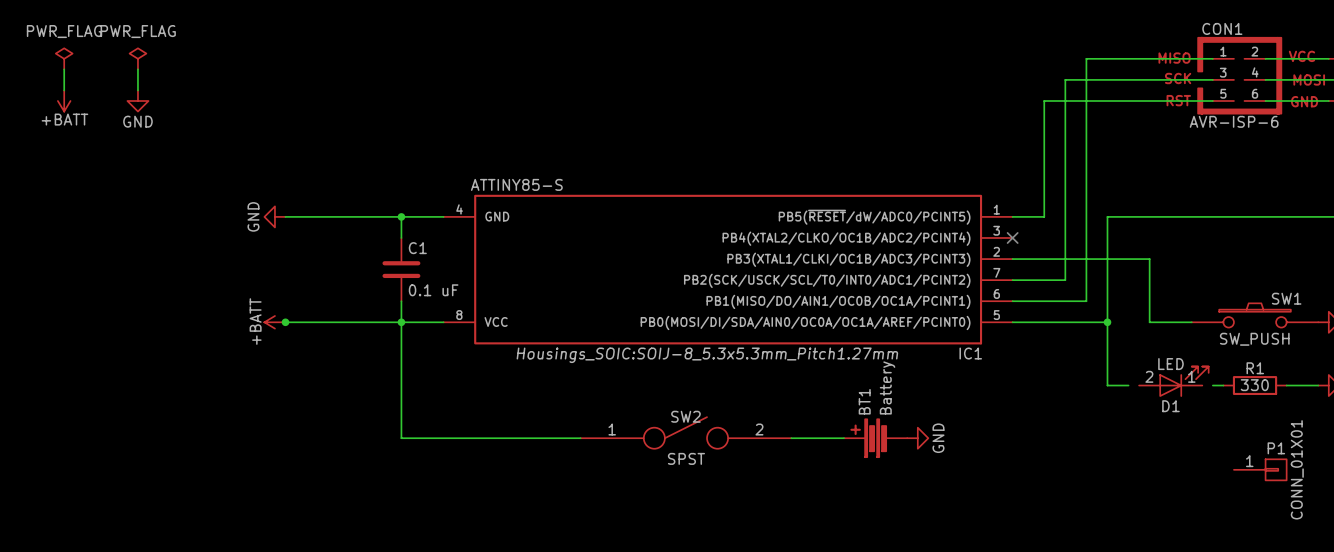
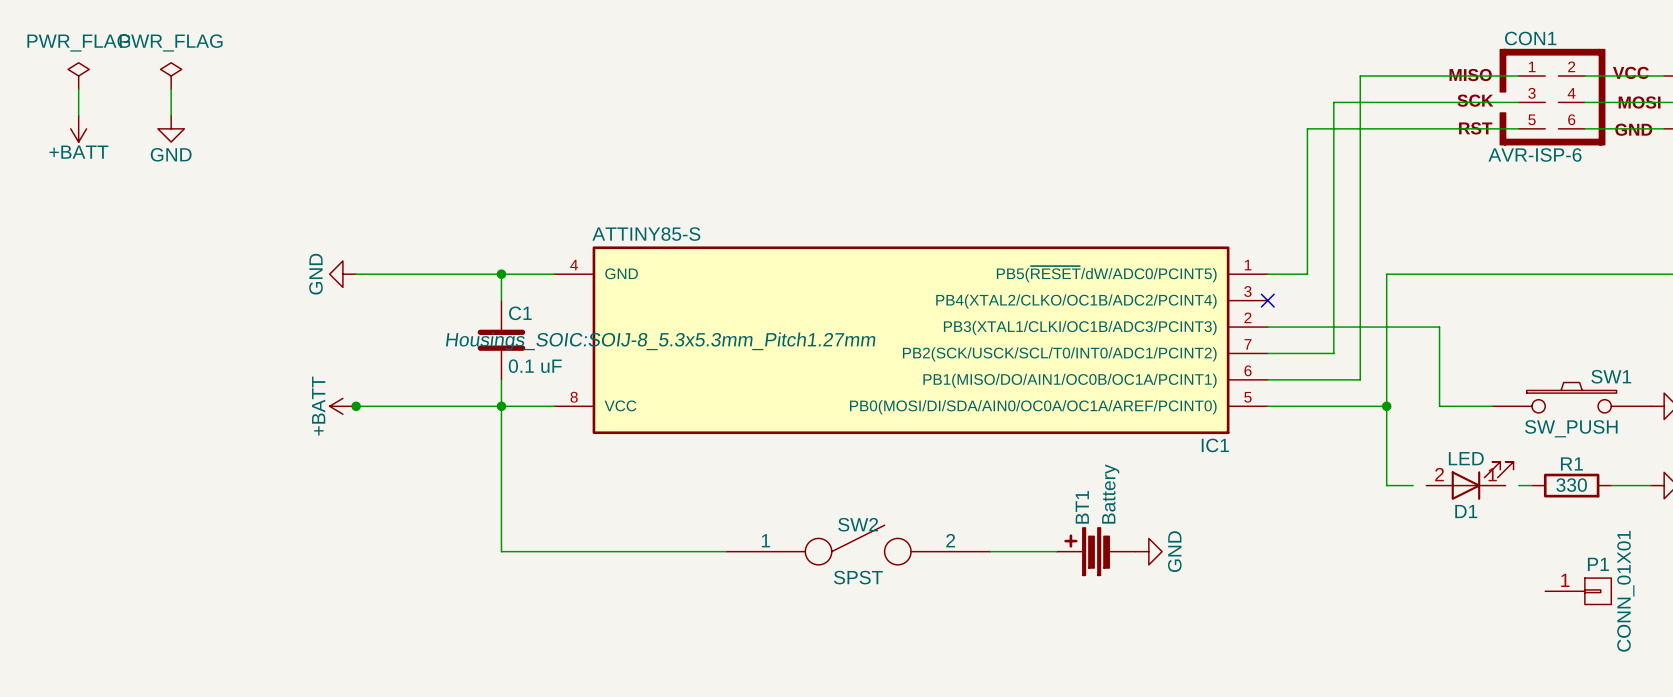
IC1 text position: Housings_SOIC:SOIJ-8_5.3x5.3mm_Pitch1.27mm (707, 355) -> Housings_SOIC:SOIJ-8_5.3x5.3mm_Pitch1.27mm (660, 341)

